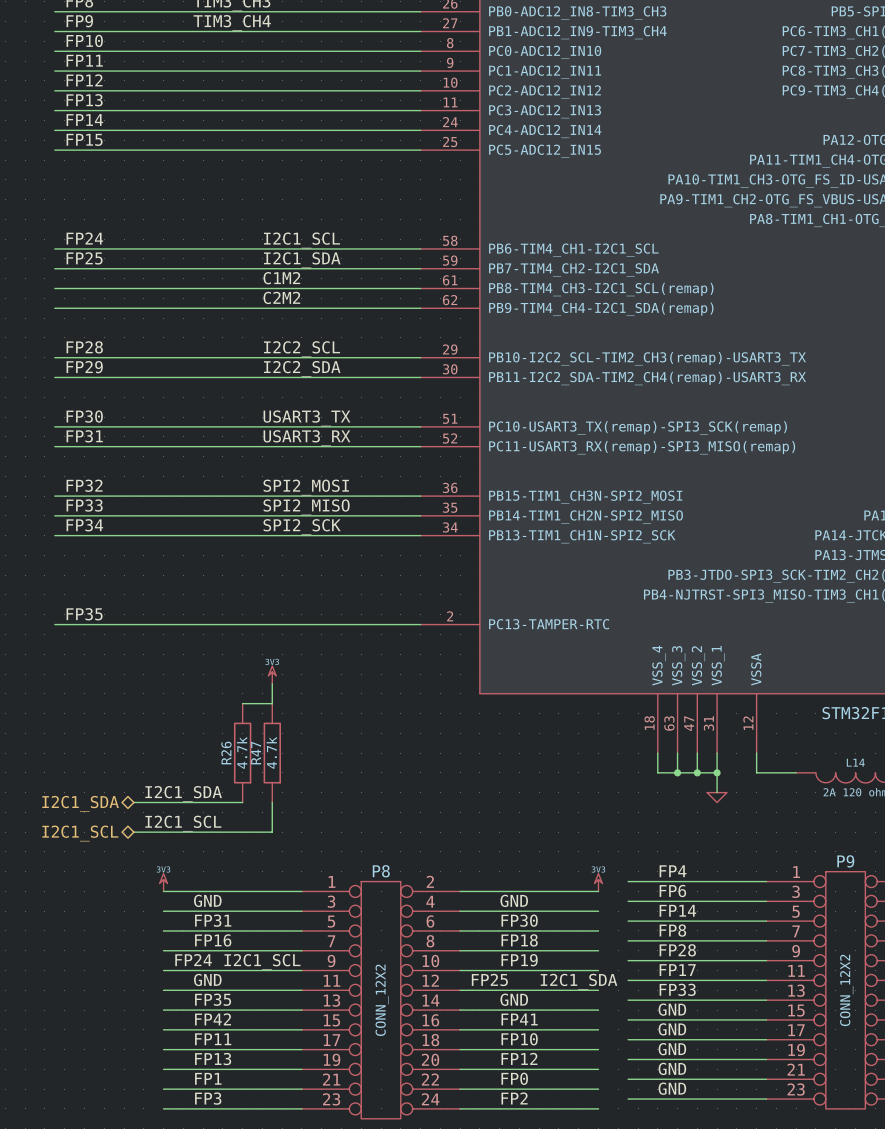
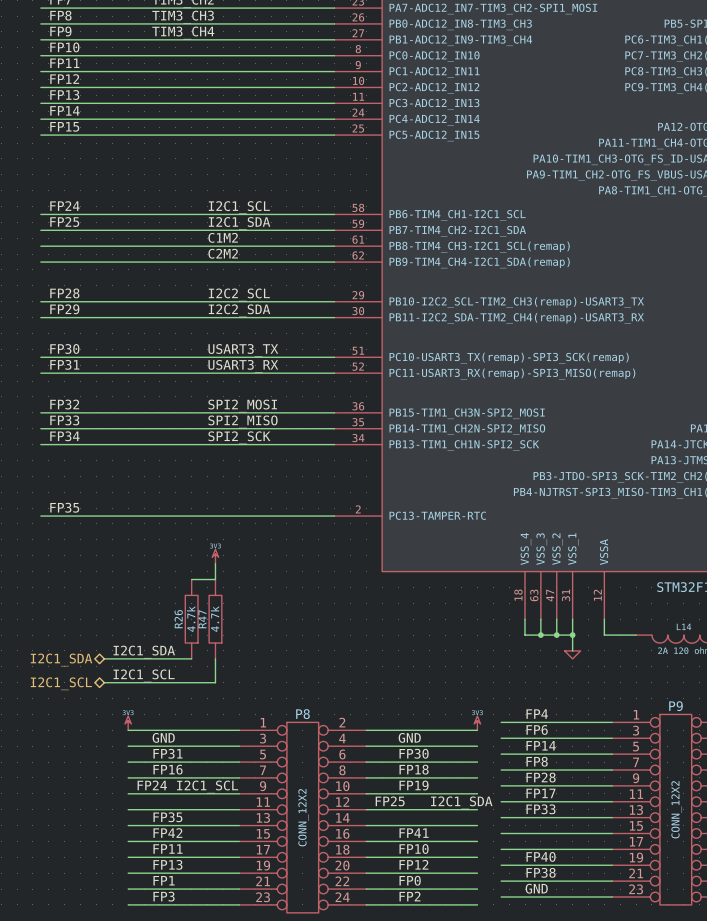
label: GND (207, 979) -> none
label: GND (514, 999) -> none
label: GND (672, 1009) -> none
label: GND (672, 1029) -> none
label: GND (672, 1049) -> FP40 (541, 856)
label: GND (672, 1068) -> FP38 (541, 872)

